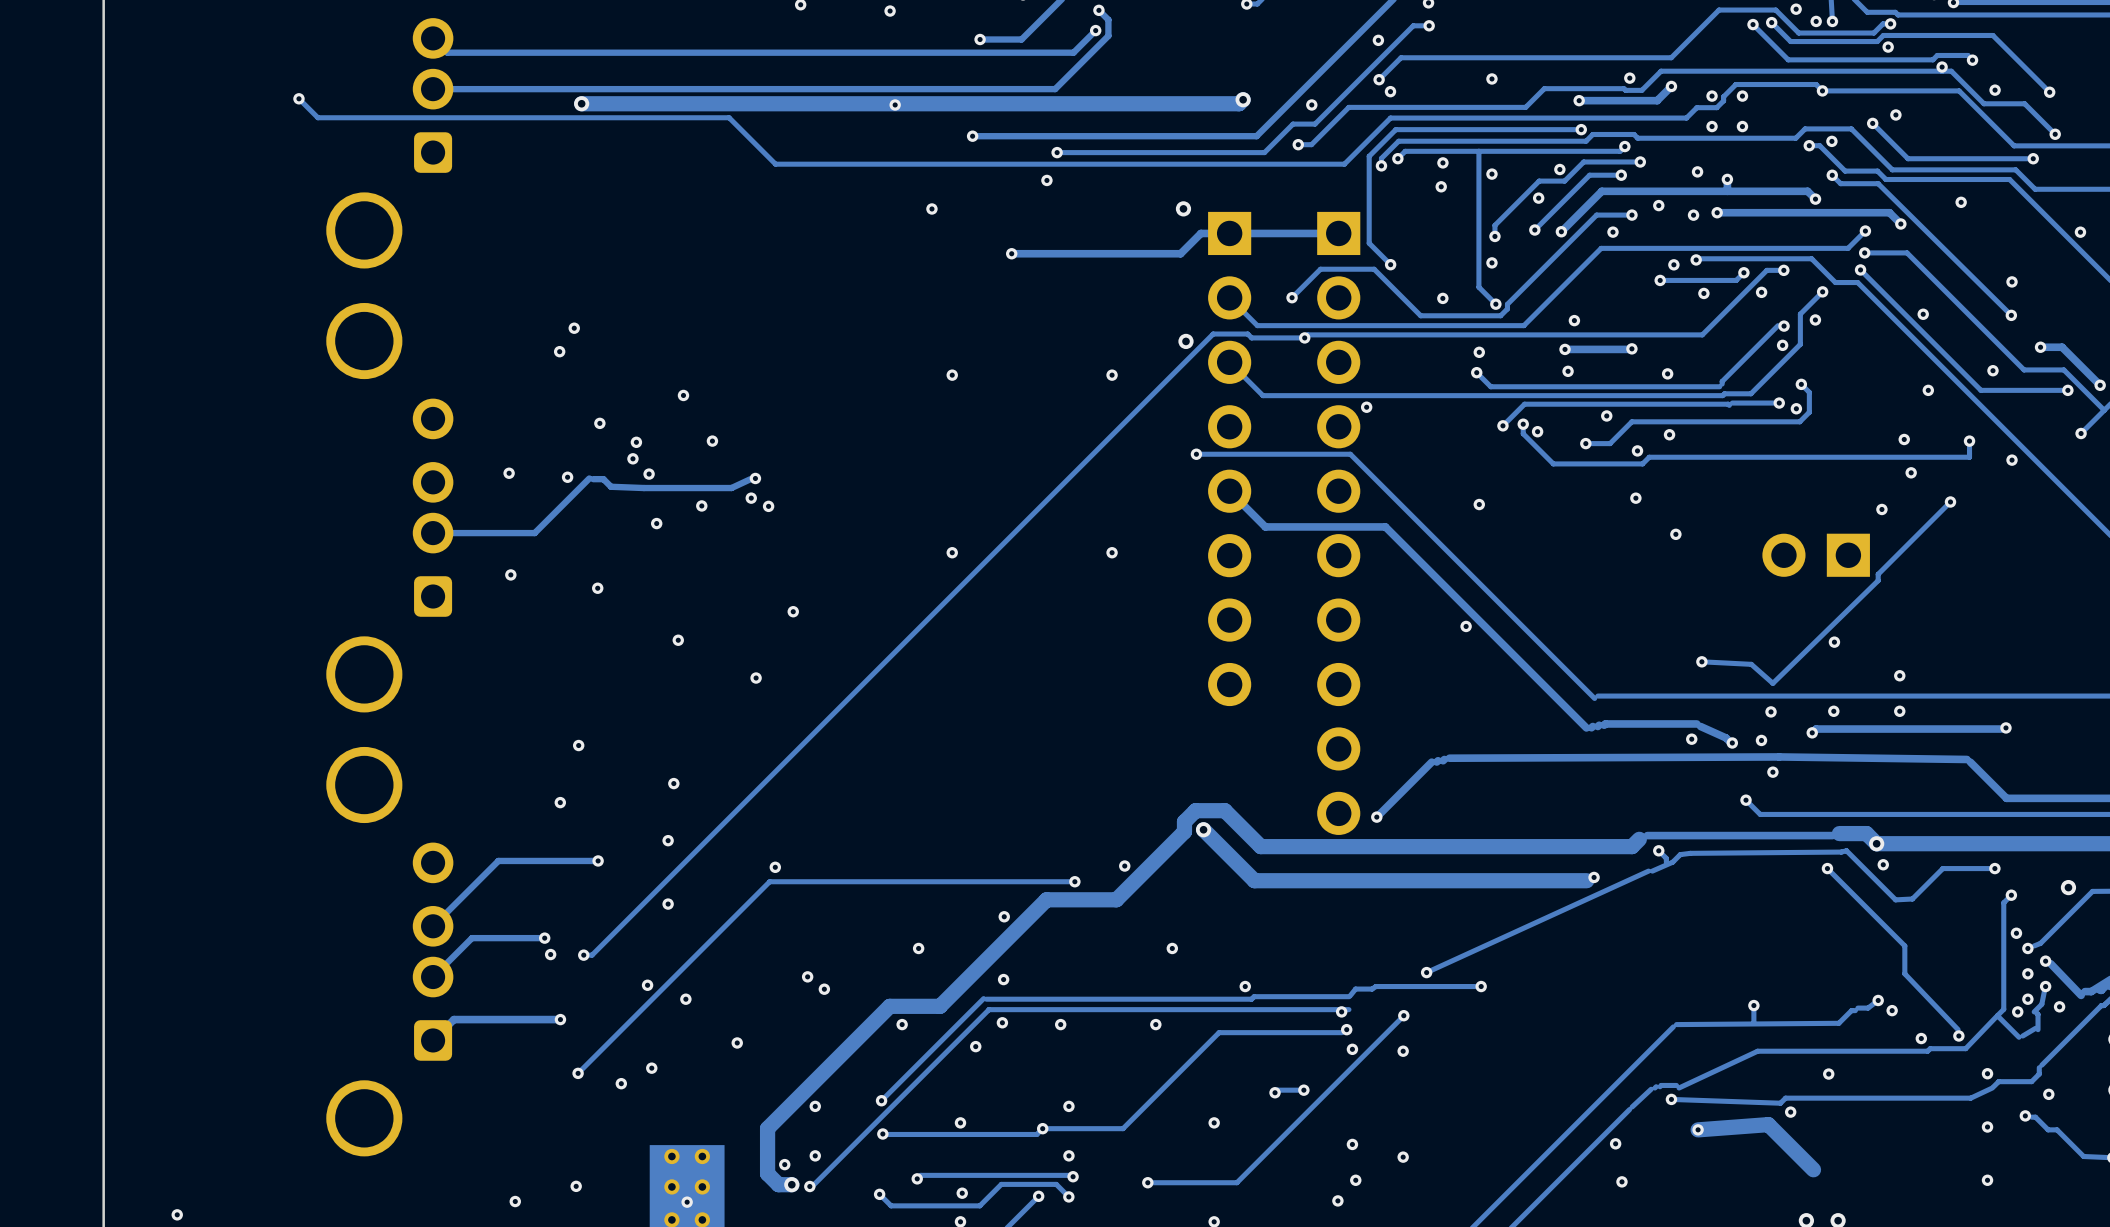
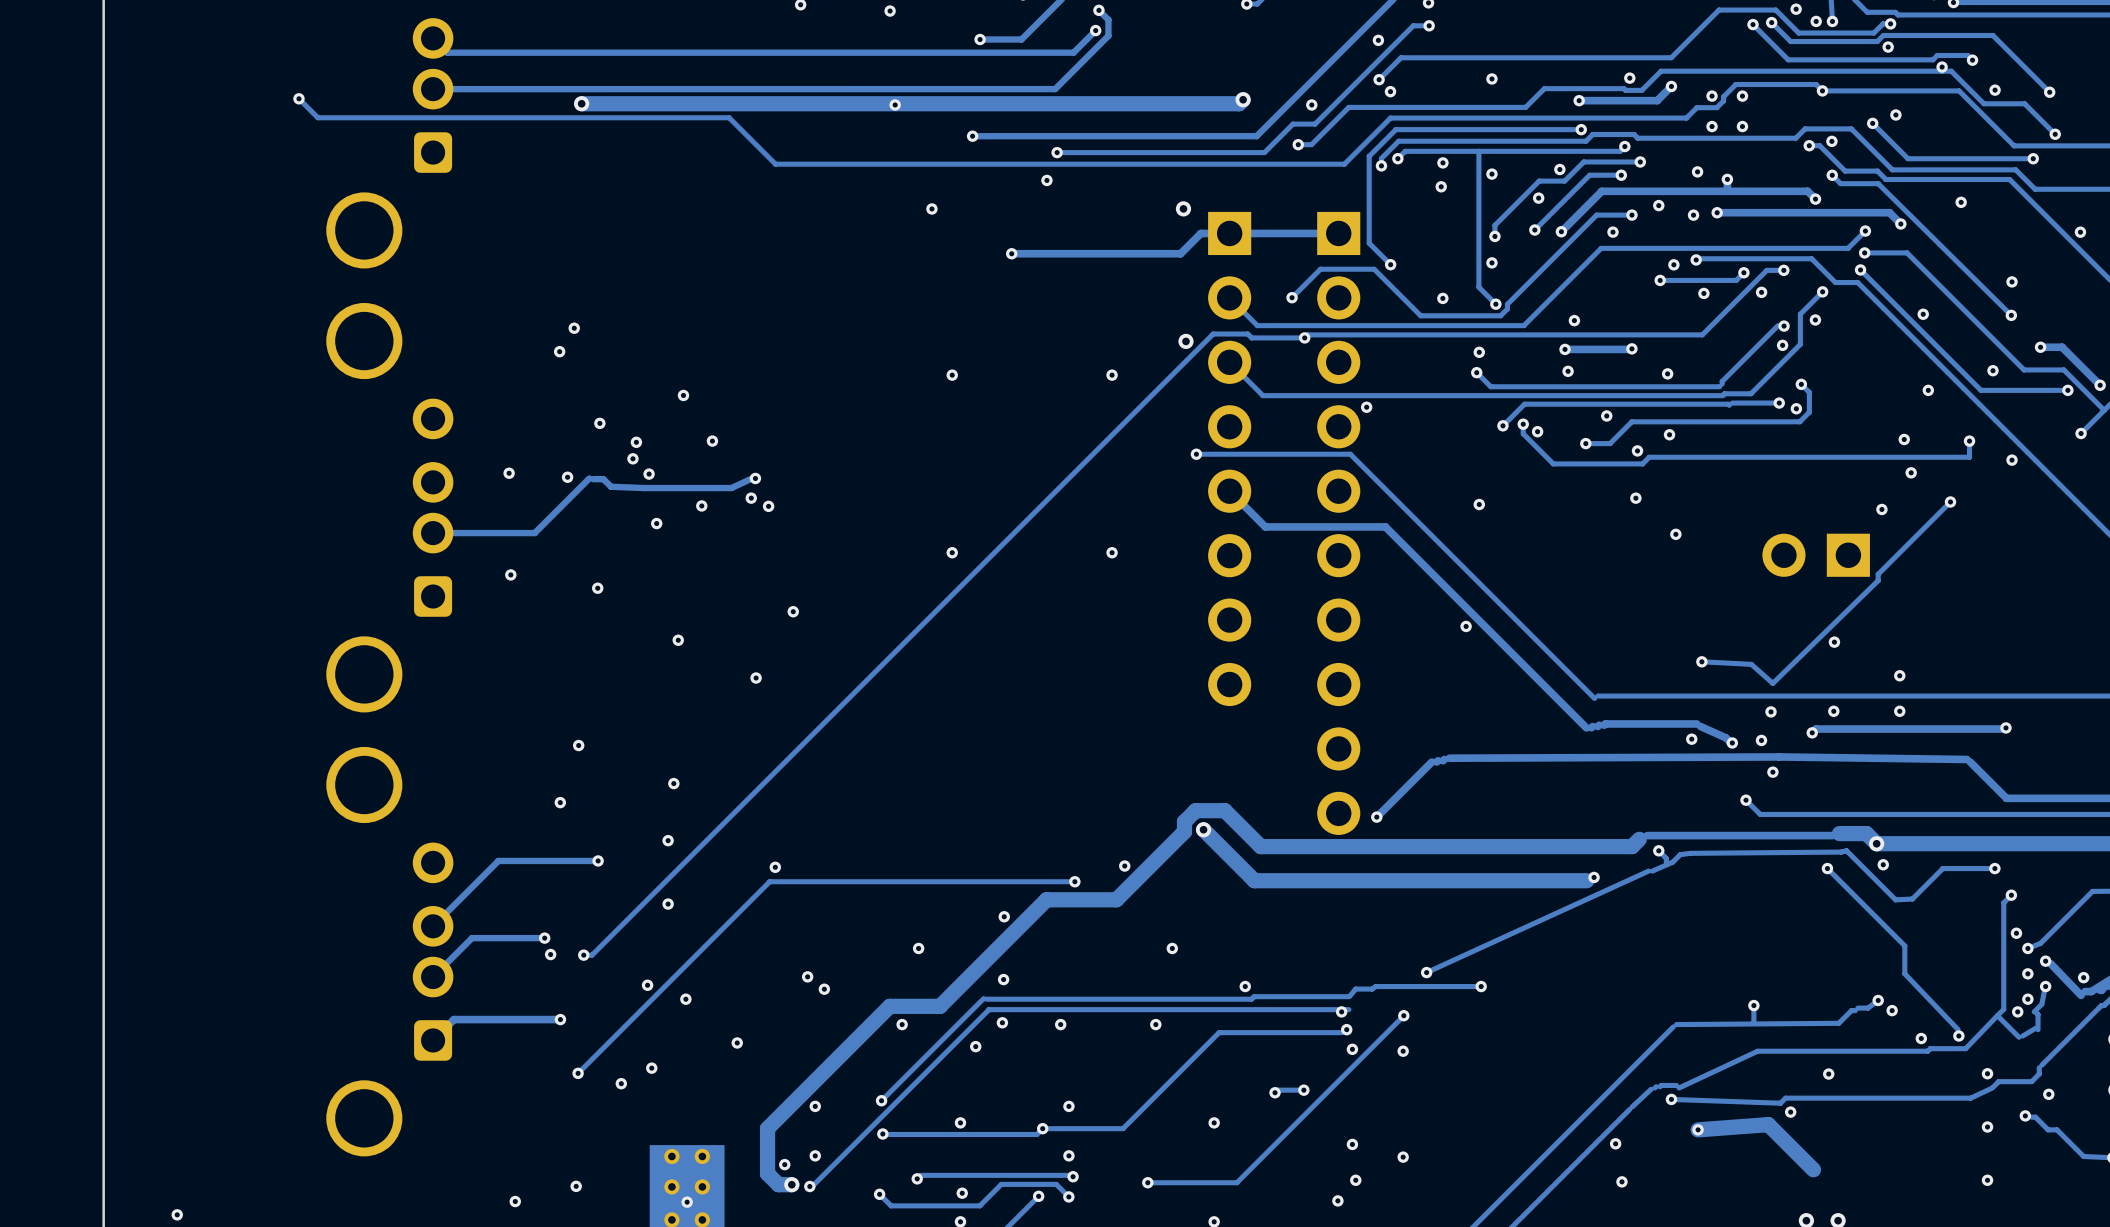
via: (2068, 887) -> none
via position: (2059, 1006) -> (2083, 977)

